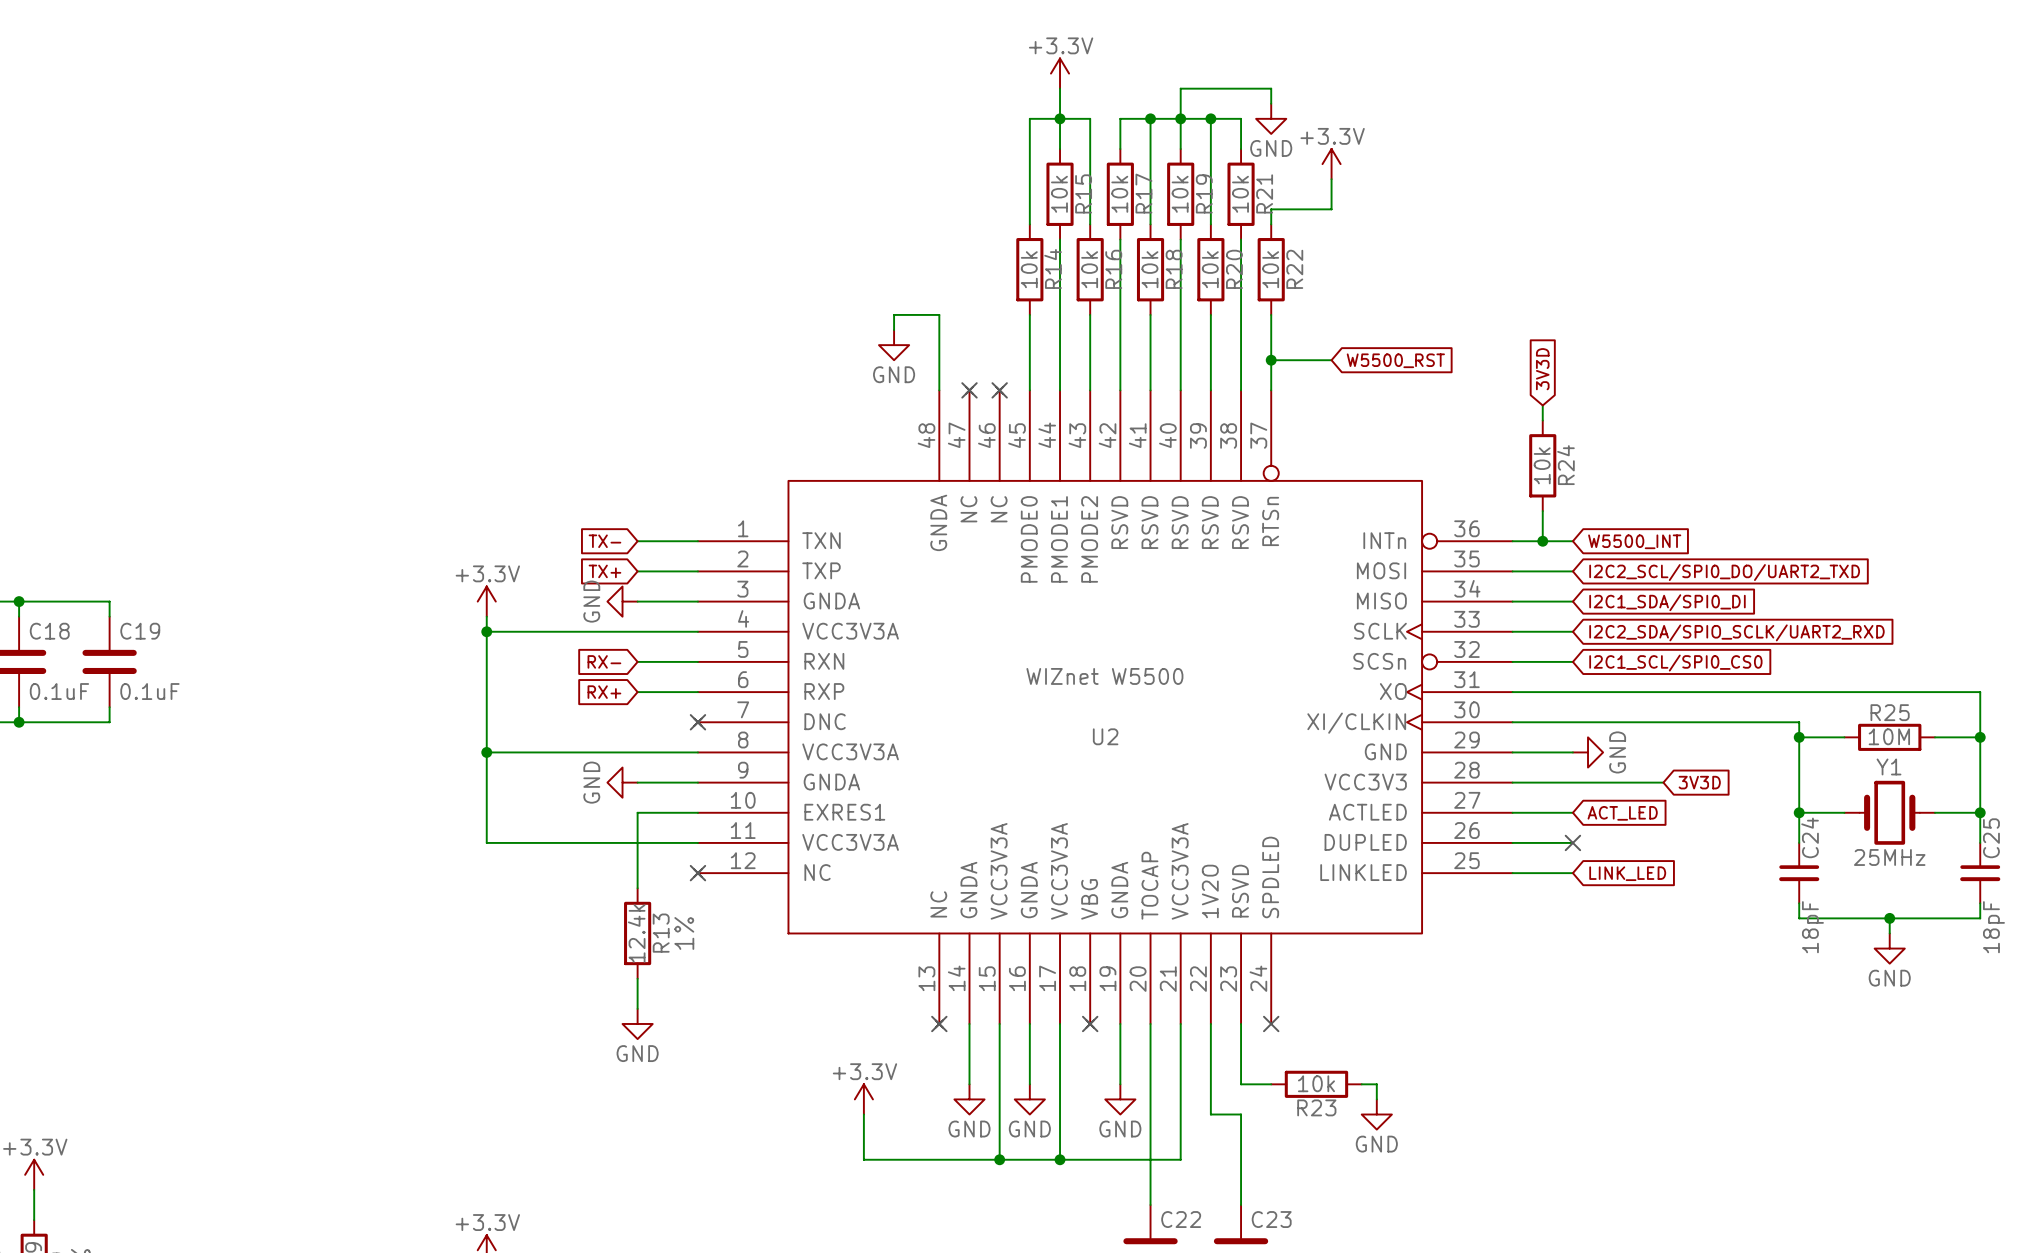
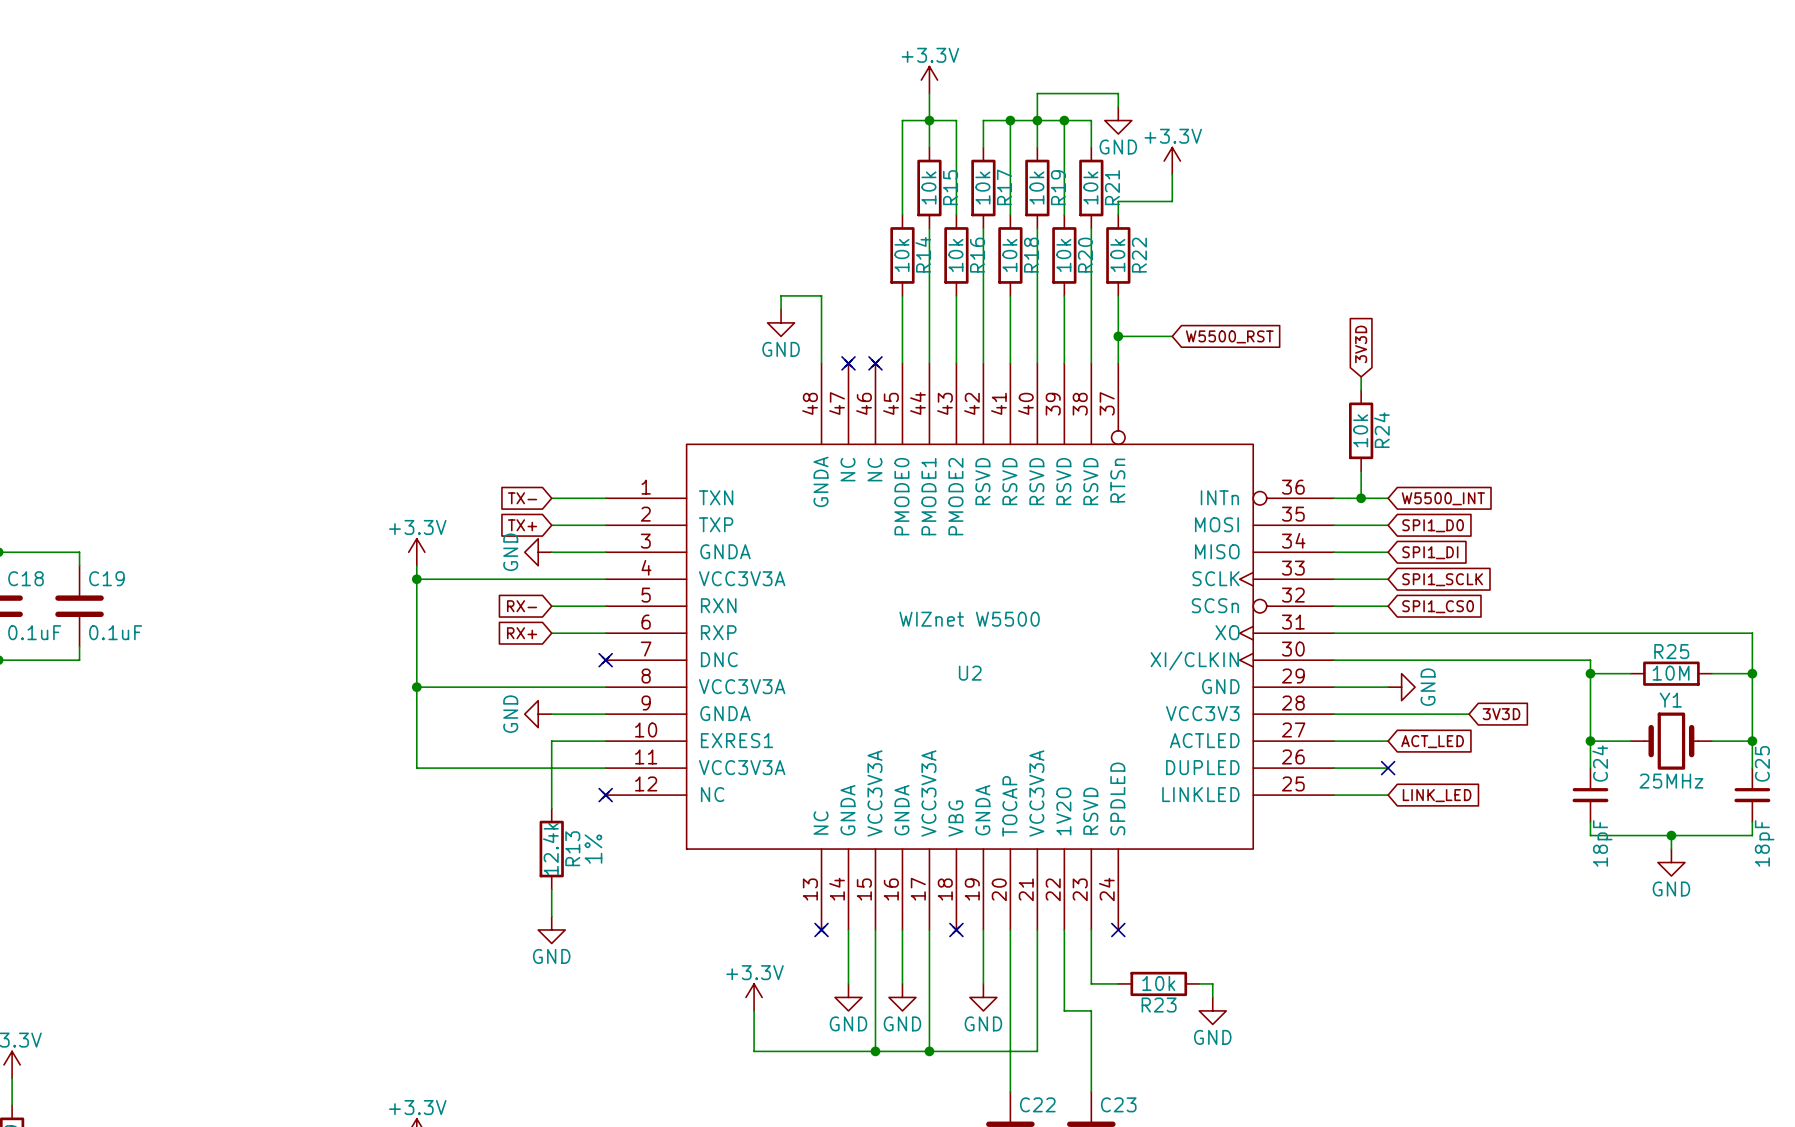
global label: I2C2_SCL/SPI0_DO/UART2_TXD (1724, 572) -> SPI1_D0 (1433, 525)
global label: I2C1_SDA/SPI0_DI (1667, 602) -> SPI1_DI (1430, 552)
global label: I2C2_SDA/SPIO_SCLK/UART2_RXD (1736, 632) -> SPI1_SCLK (1442, 579)
global label: I2C1_SCL/SPI0_CS0 (1675, 663) -> SPI1_CS0 (1438, 606)

